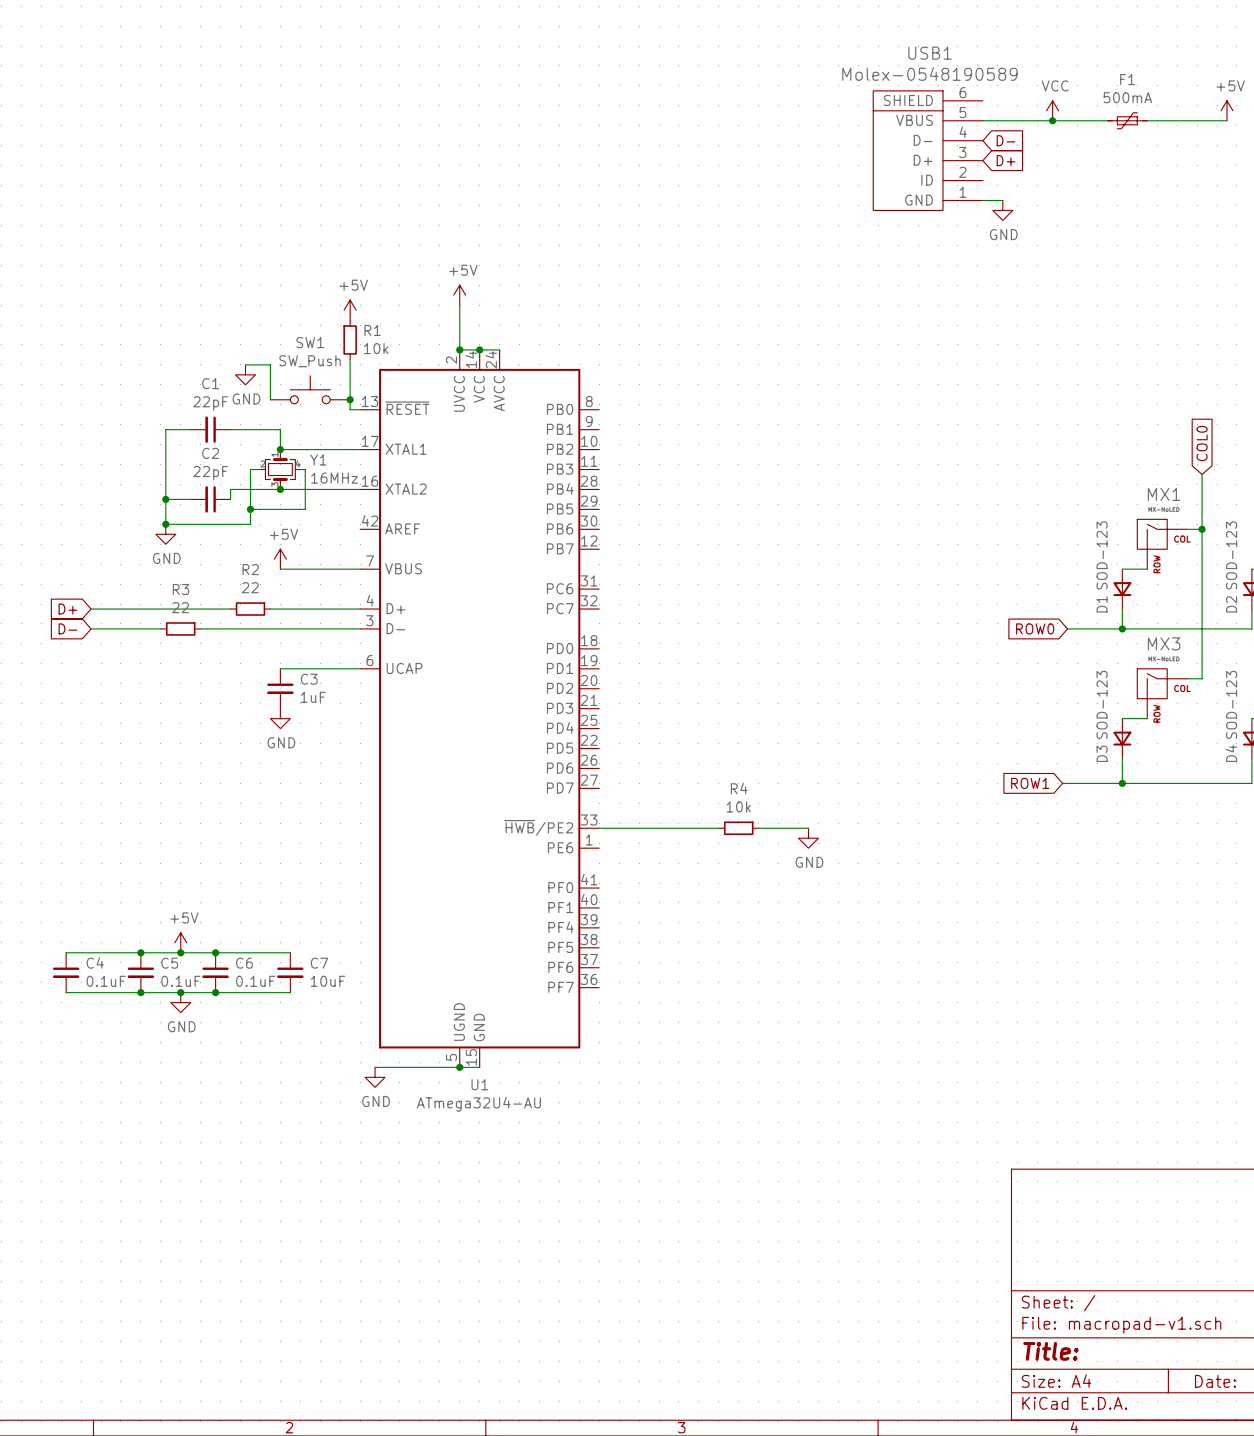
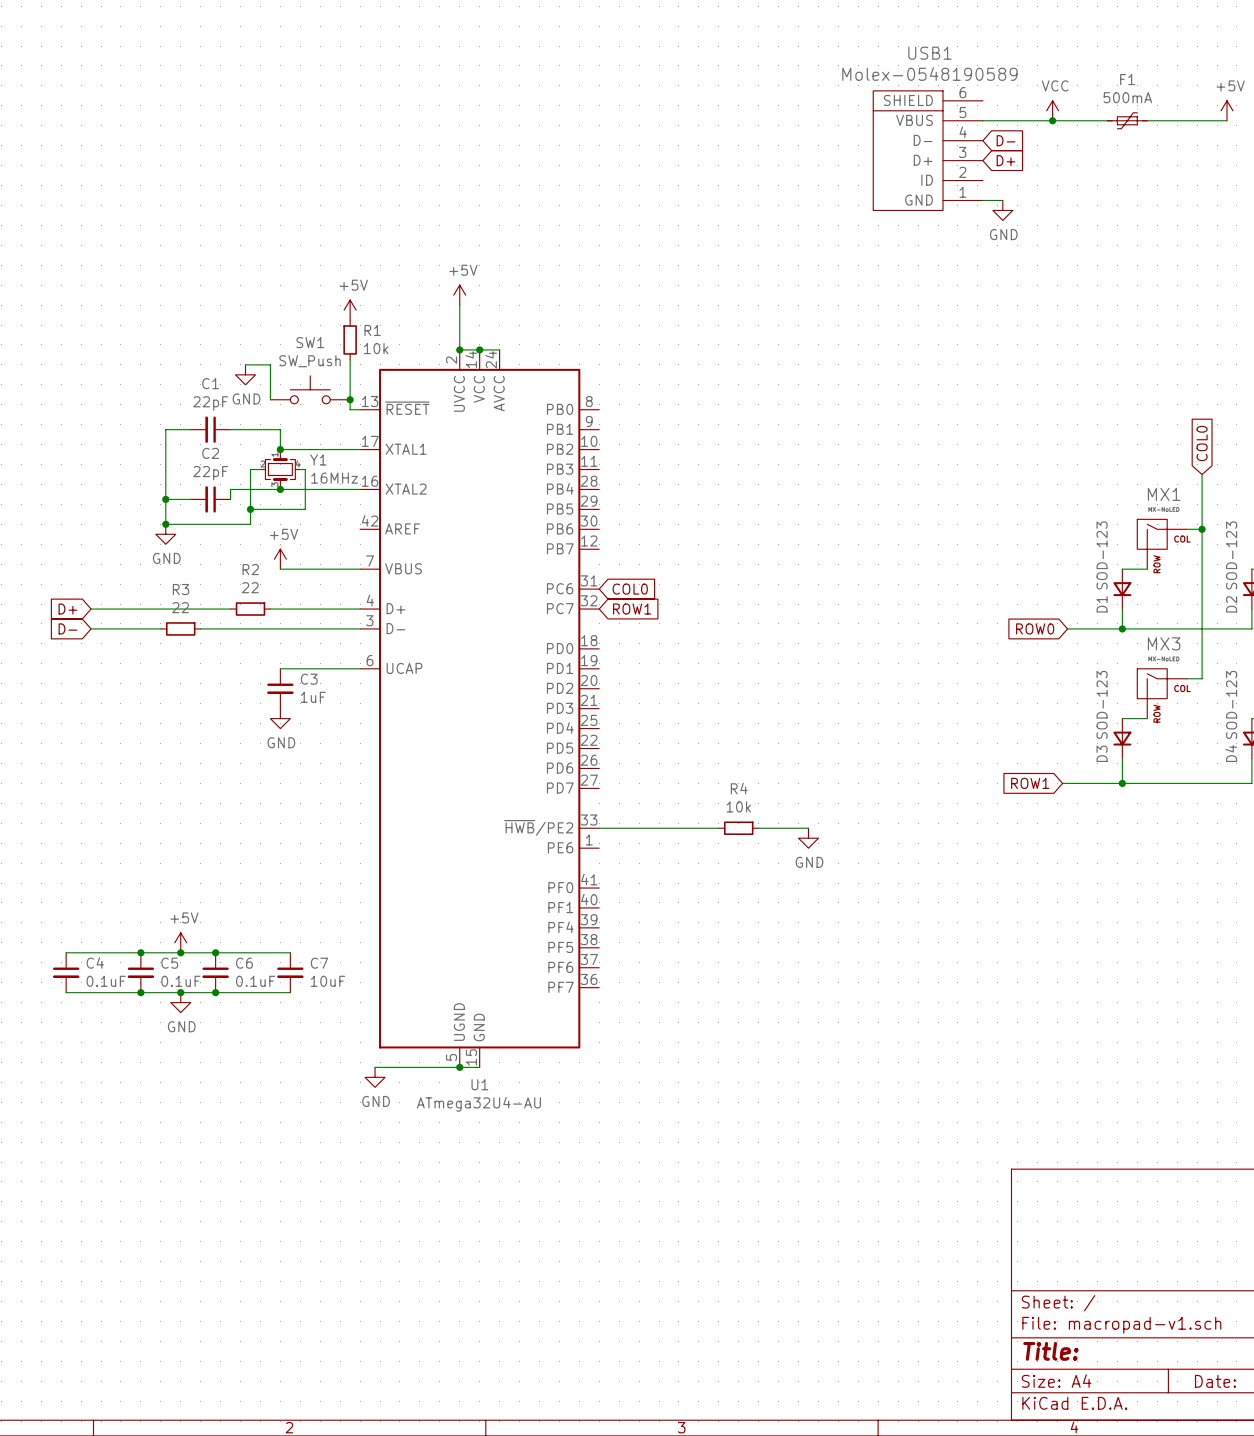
global label: none -> COL0 (630, 589)
global label: none -> ROW1 (632, 609)

